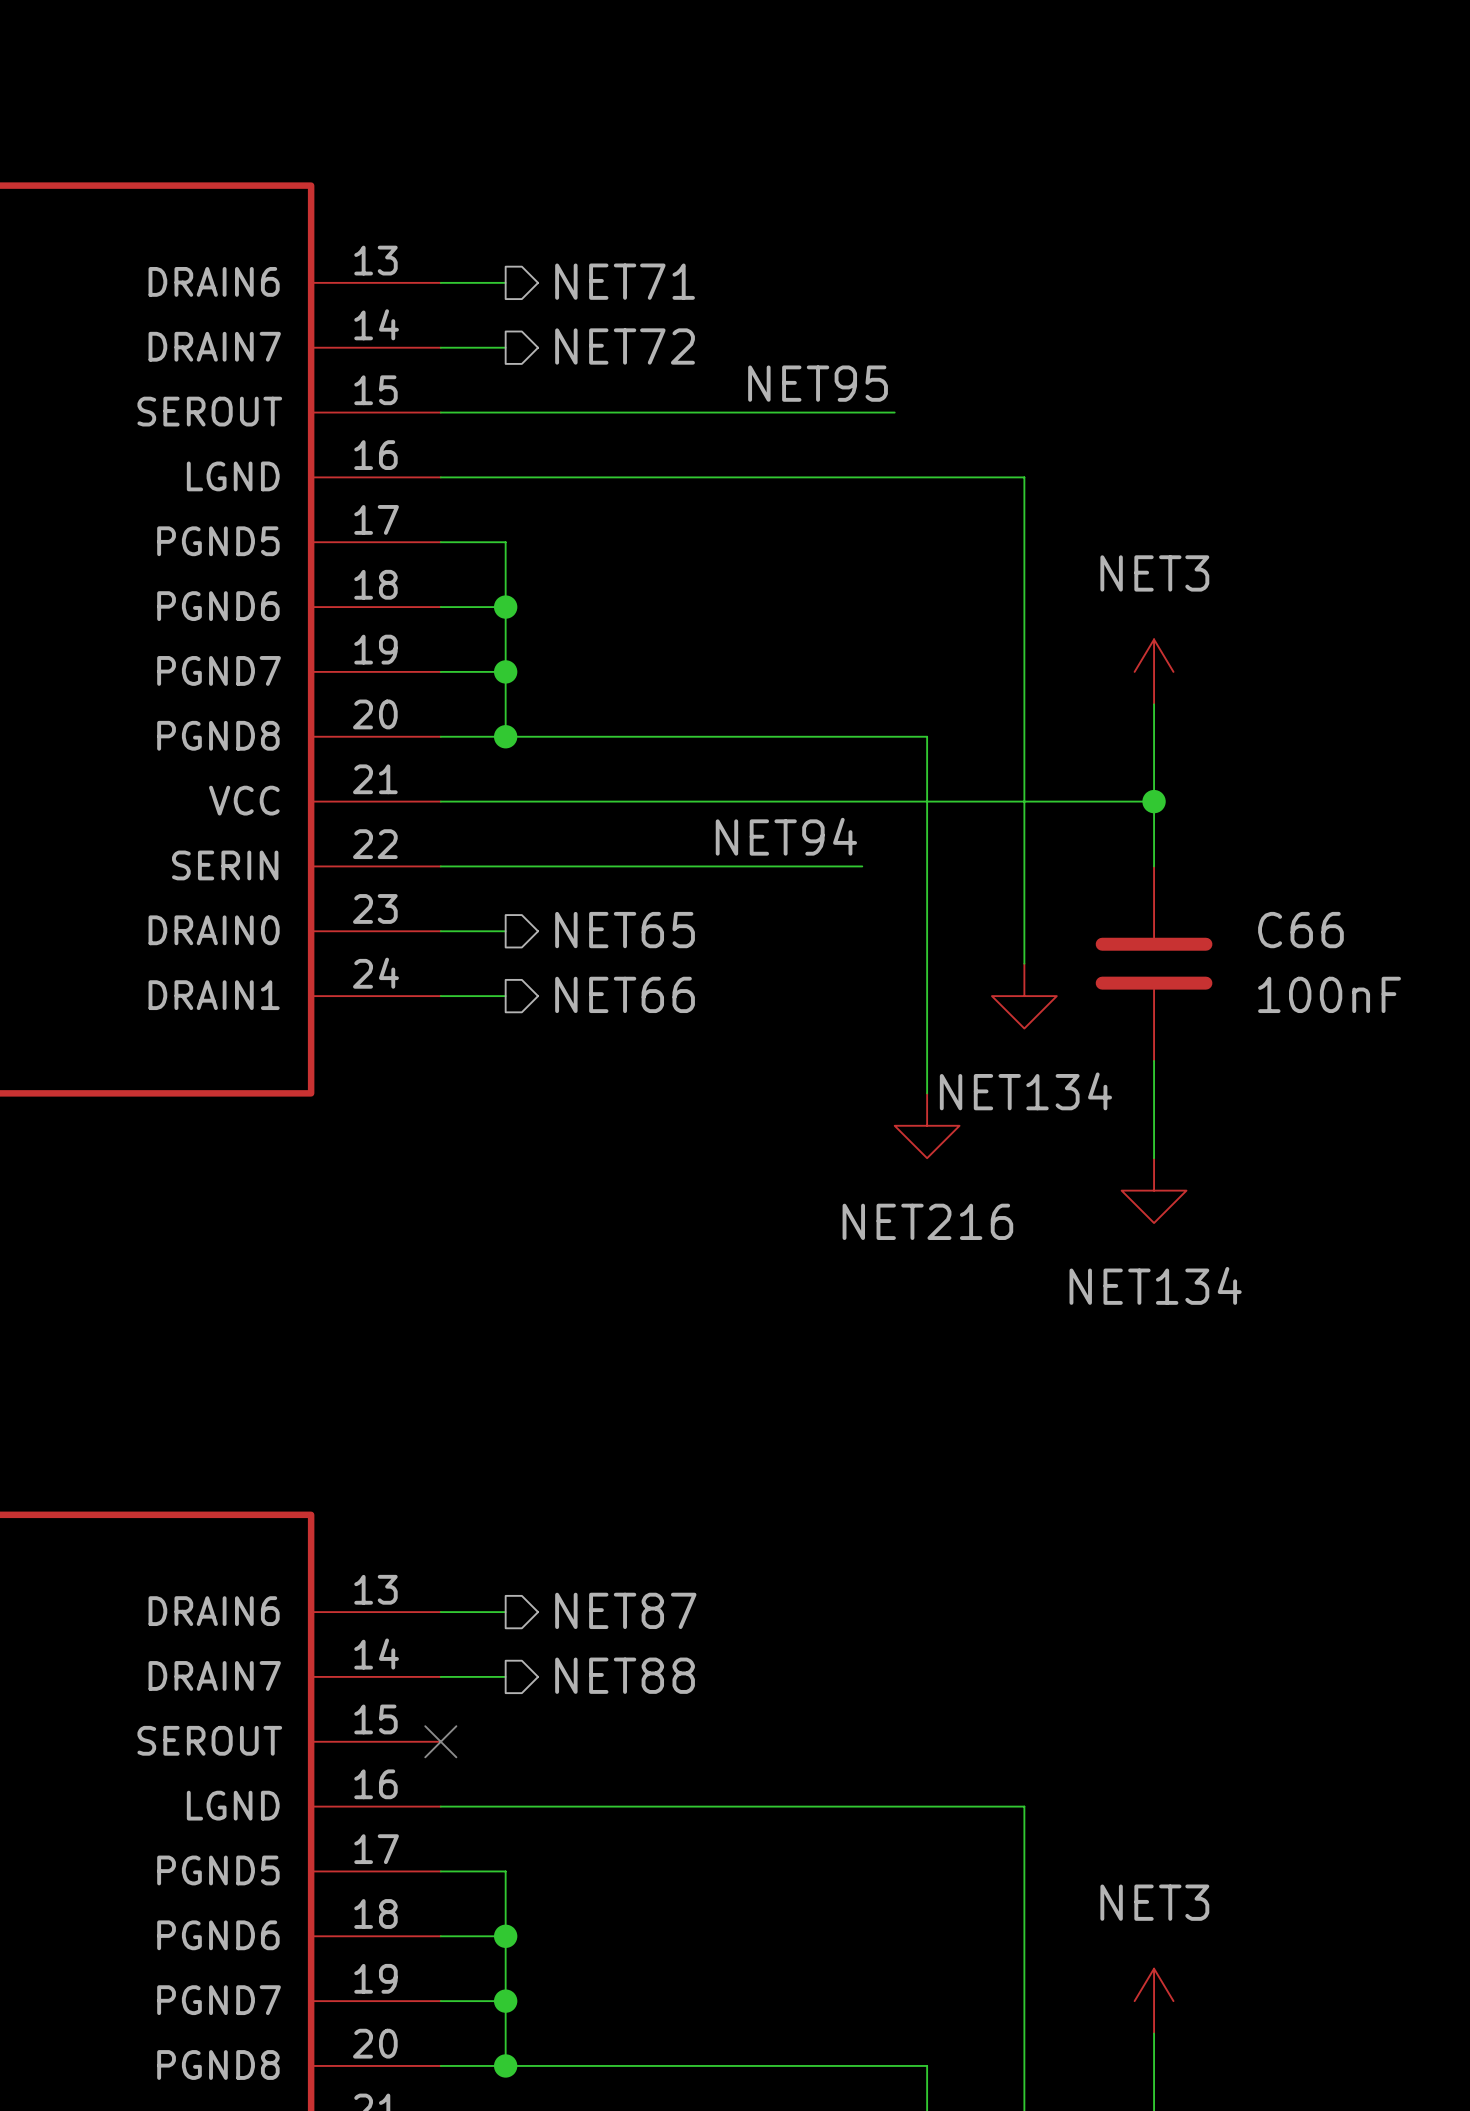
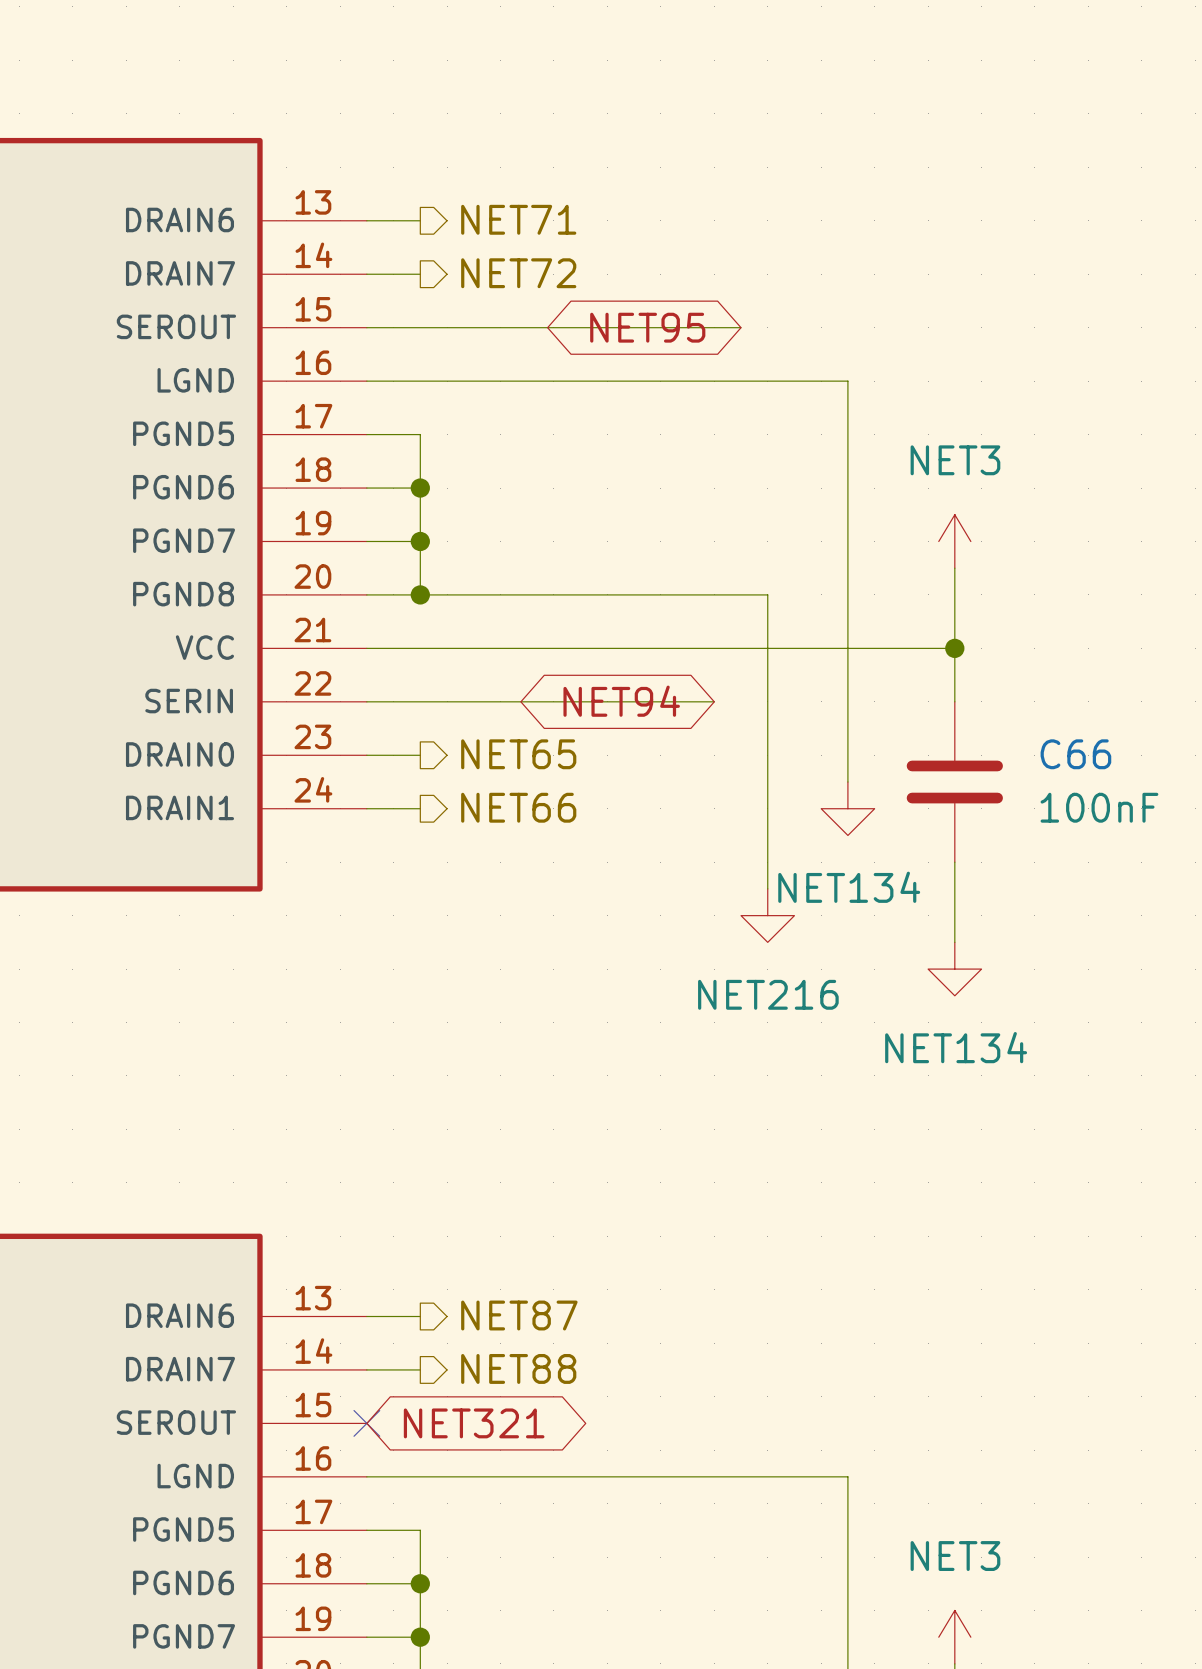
label: NET95 (818, 383) -> none
global label: none -> NET95 (647, 327)
label: NET94 (786, 836) -> none
global label: none -> NET94 (621, 701)
global label: none -> NET321 (474, 1423)

